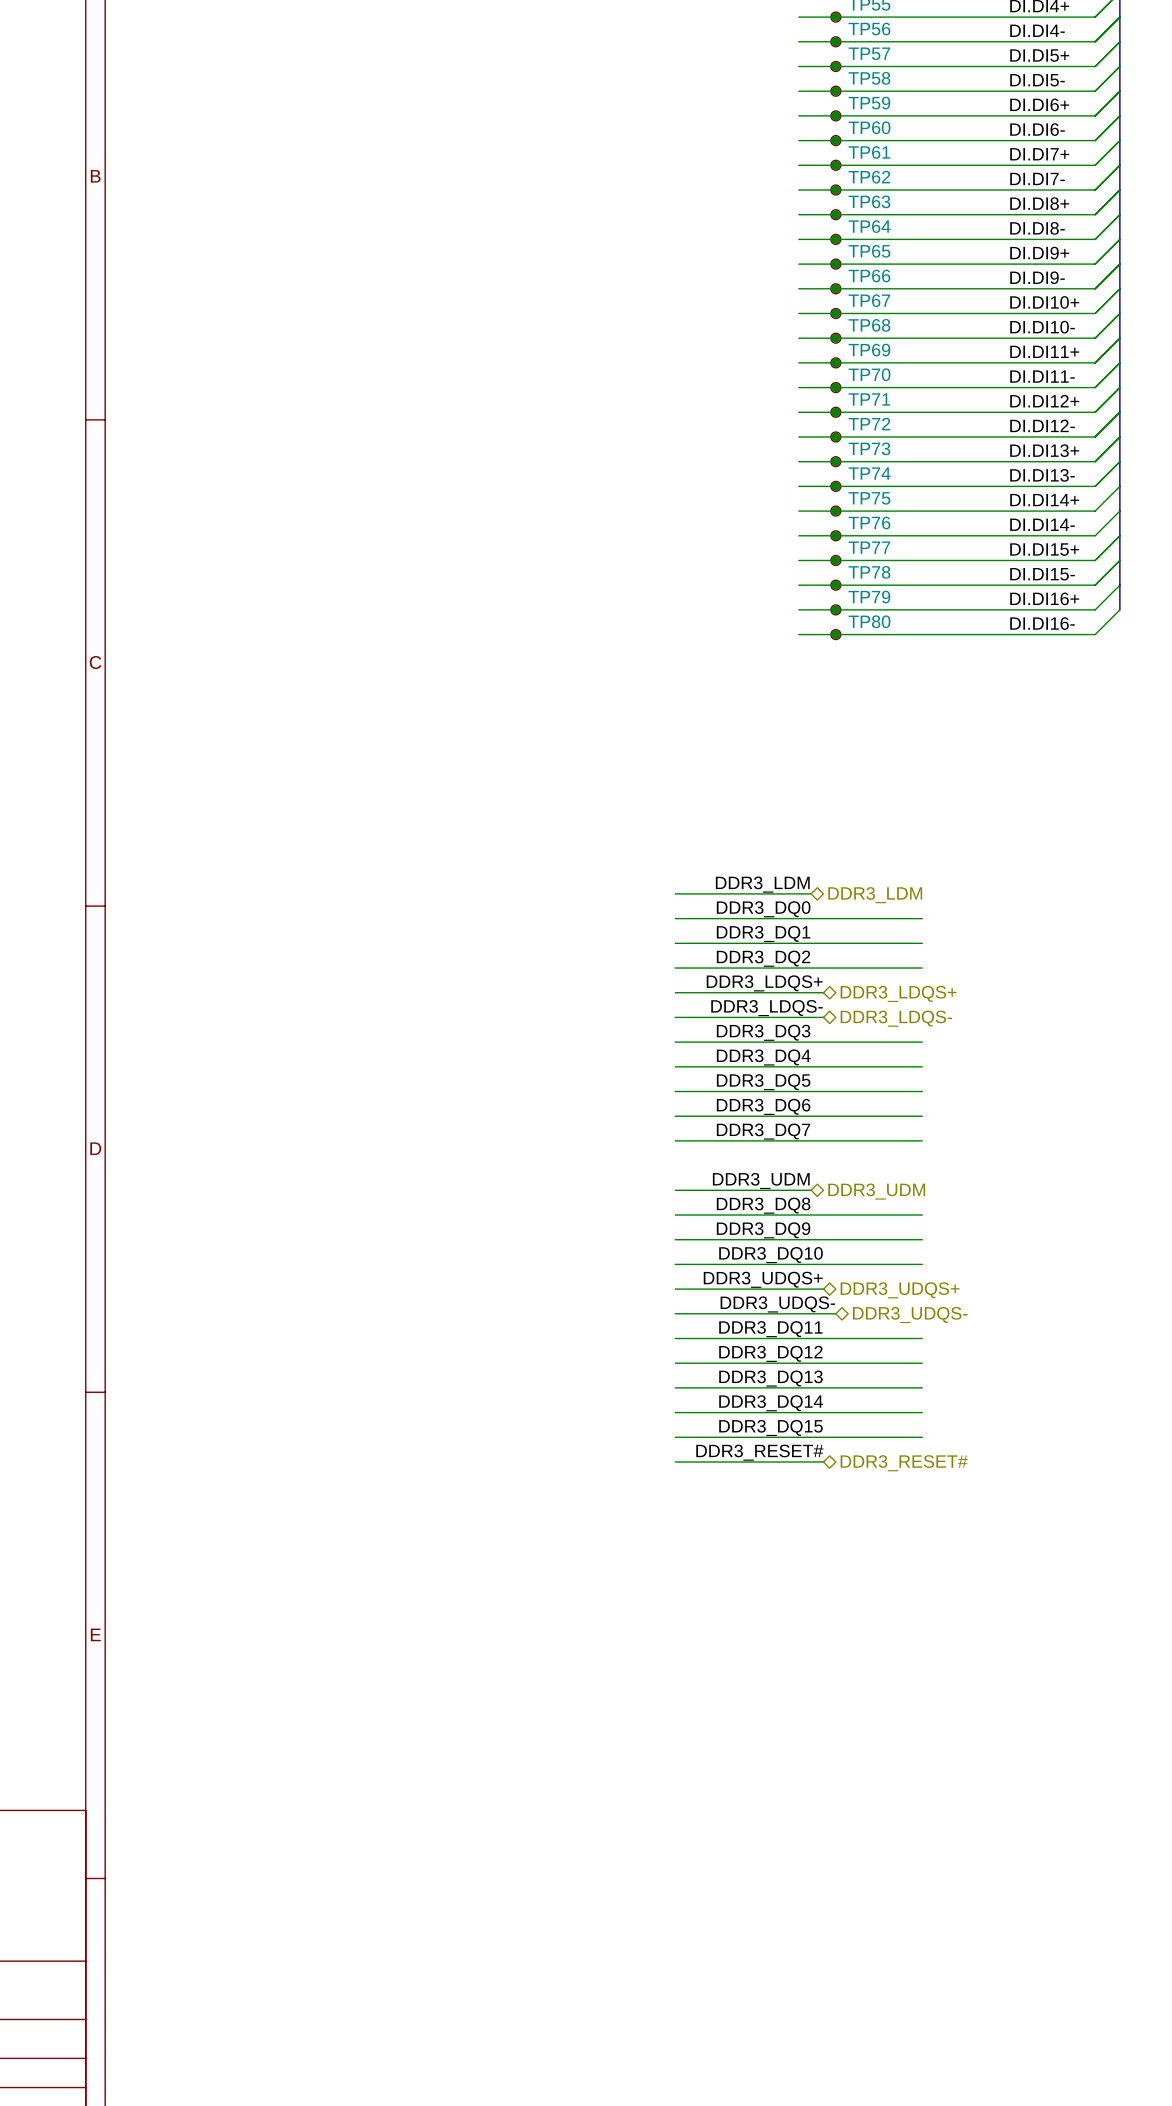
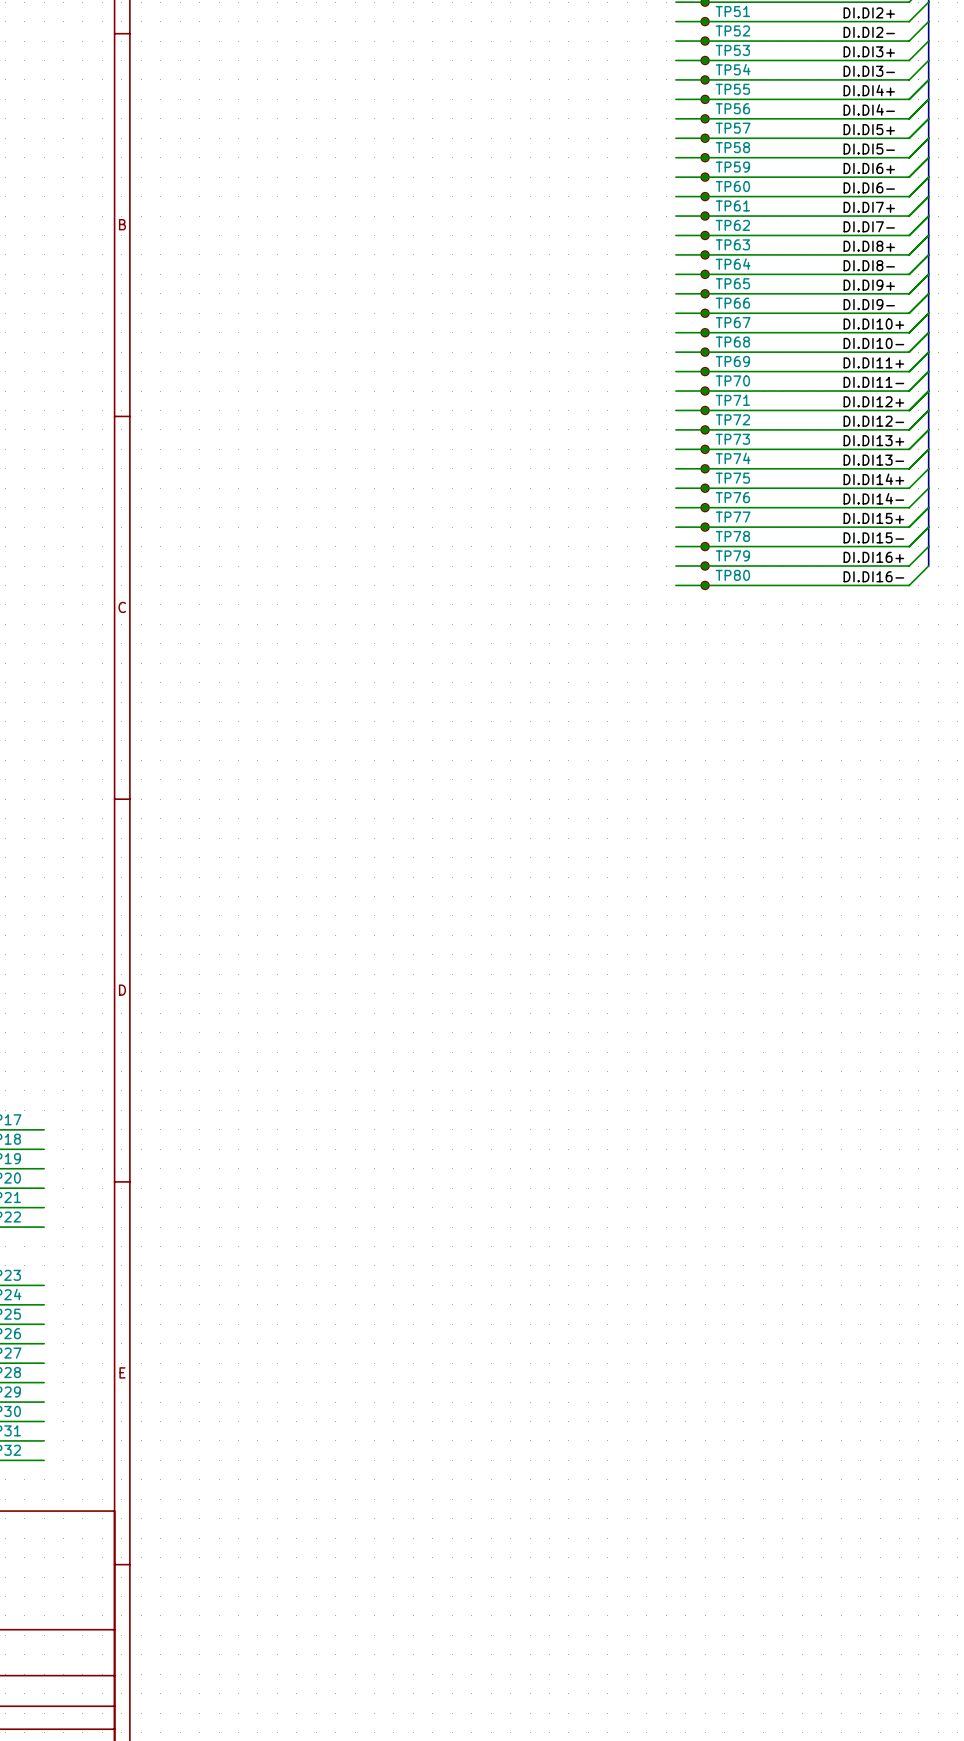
label: DDR3_LDM (762, 884) -> none
wire: (675, 893) (811, 893) -> none
hierarchical label: DDR3_LDM (875, 895) -> none
label: DDR3_DQ0 (763, 909) -> none
wire: (675, 918) (922, 918) -> none
label: DDR3_DQ1 (763, 933) -> none
wire: (675, 943) (922, 943) -> none
label: DDR3_DQ2 (763, 958) -> none
wire: (675, 968) (922, 968) -> none
label: DDR3_LDQS+ (764, 983) -> none
wire: (675, 992) (823, 992) -> none
hierarchical label: DDR3_LDQS+ (898, 993) -> none
label: DDR3_LDQS- (766, 1008) -> none
wire: (675, 1017) (823, 1017) -> none
hierarchical label: DDR3_LDQS- (896, 1018) -> none
label: DDR3_DQ3 (763, 1032) -> none
wire: (675, 1042) (922, 1042) -> none
label: DDR3_DQ4 (763, 1057) -> none
wire: (675, 1066) (922, 1066) -> none
label: DDR3_DQ5 (763, 1082) -> none
wire: (675, 1091) (922, 1091) -> none
label: DDR3_DQ6 (763, 1106) -> none
wire: (675, 1116) (922, 1116) -> none
label: DDR3_DQ7 (763, 1131) -> none
wire: (675, 1140) (922, 1140) -> none
label: DDR3_UDM (761, 1180) -> none
wire: (675, 1190) (811, 1190) -> none
hierarchical label: DDR3_UDM (876, 1191) -> none
label: DDR3_DQ8 (763, 1205) -> none
wire: (675, 1215) (922, 1215) -> none
label: DDR3_DQ9 (763, 1230) -> none
wire: (675, 1239) (922, 1239) -> none
label: DDR3_DQ10 (771, 1255) -> none
wire: (675, 1264) (922, 1264) -> none
label: DDR3_UDQS+ (763, 1279) -> none
wire: (675, 1289) (823, 1289) -> none
hierarchical label: DDR3_UDQS+ (900, 1290) -> none
label: DDR3_UDQS- (777, 1304) -> none
wire: (675, 1313) (835, 1313) -> none
hierarchical label: DDR3_UDQS- (910, 1315) -> none
label: DDR3_DQ11 (770, 1329) -> none
wire: (675, 1338) (922, 1338) -> none
label: DDR3_DQ12 (770, 1353) -> none
wire: (675, 1363) (922, 1363) -> none
label: DDR3_DQ13 (770, 1378) -> none
wire: (675, 1387) (922, 1387) -> none
label: DDR3_DQ14 (771, 1403) -> none
wire: (675, 1412) (922, 1412) -> none
label: DDR3_DQ15 (770, 1427) -> none
wire: (675, 1437) (922, 1437) -> none
label: DDR3_RESET# (759, 1452) -> none
wire: (675, 1462) (823, 1462) -> none
hierarchical label: DDR3_RESET# (904, 1463) -> none

